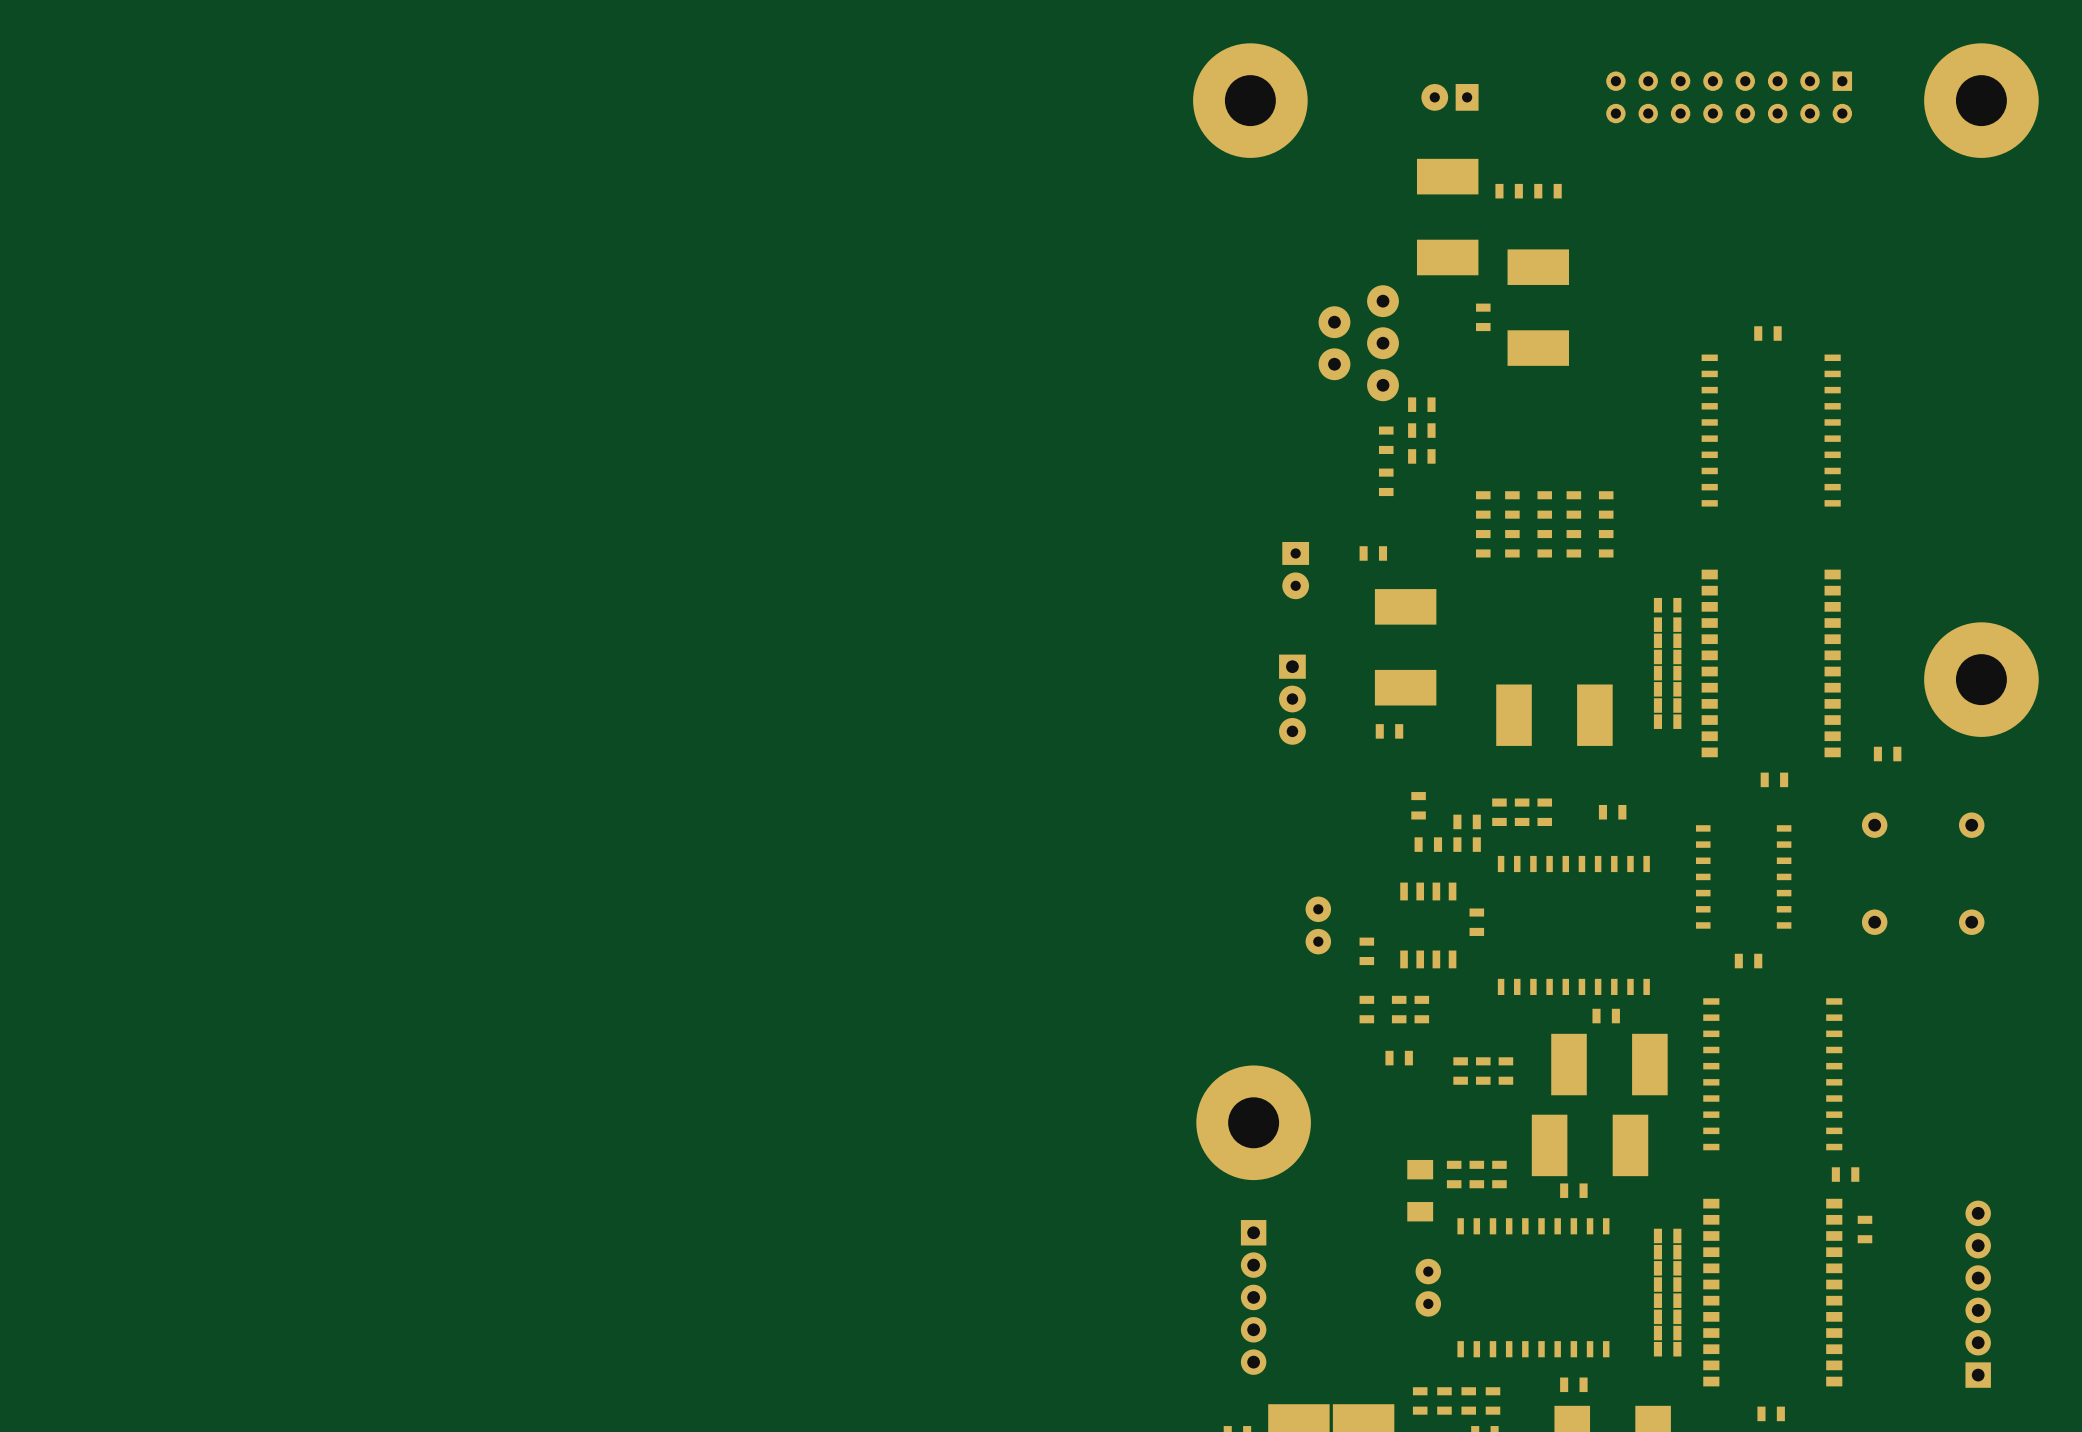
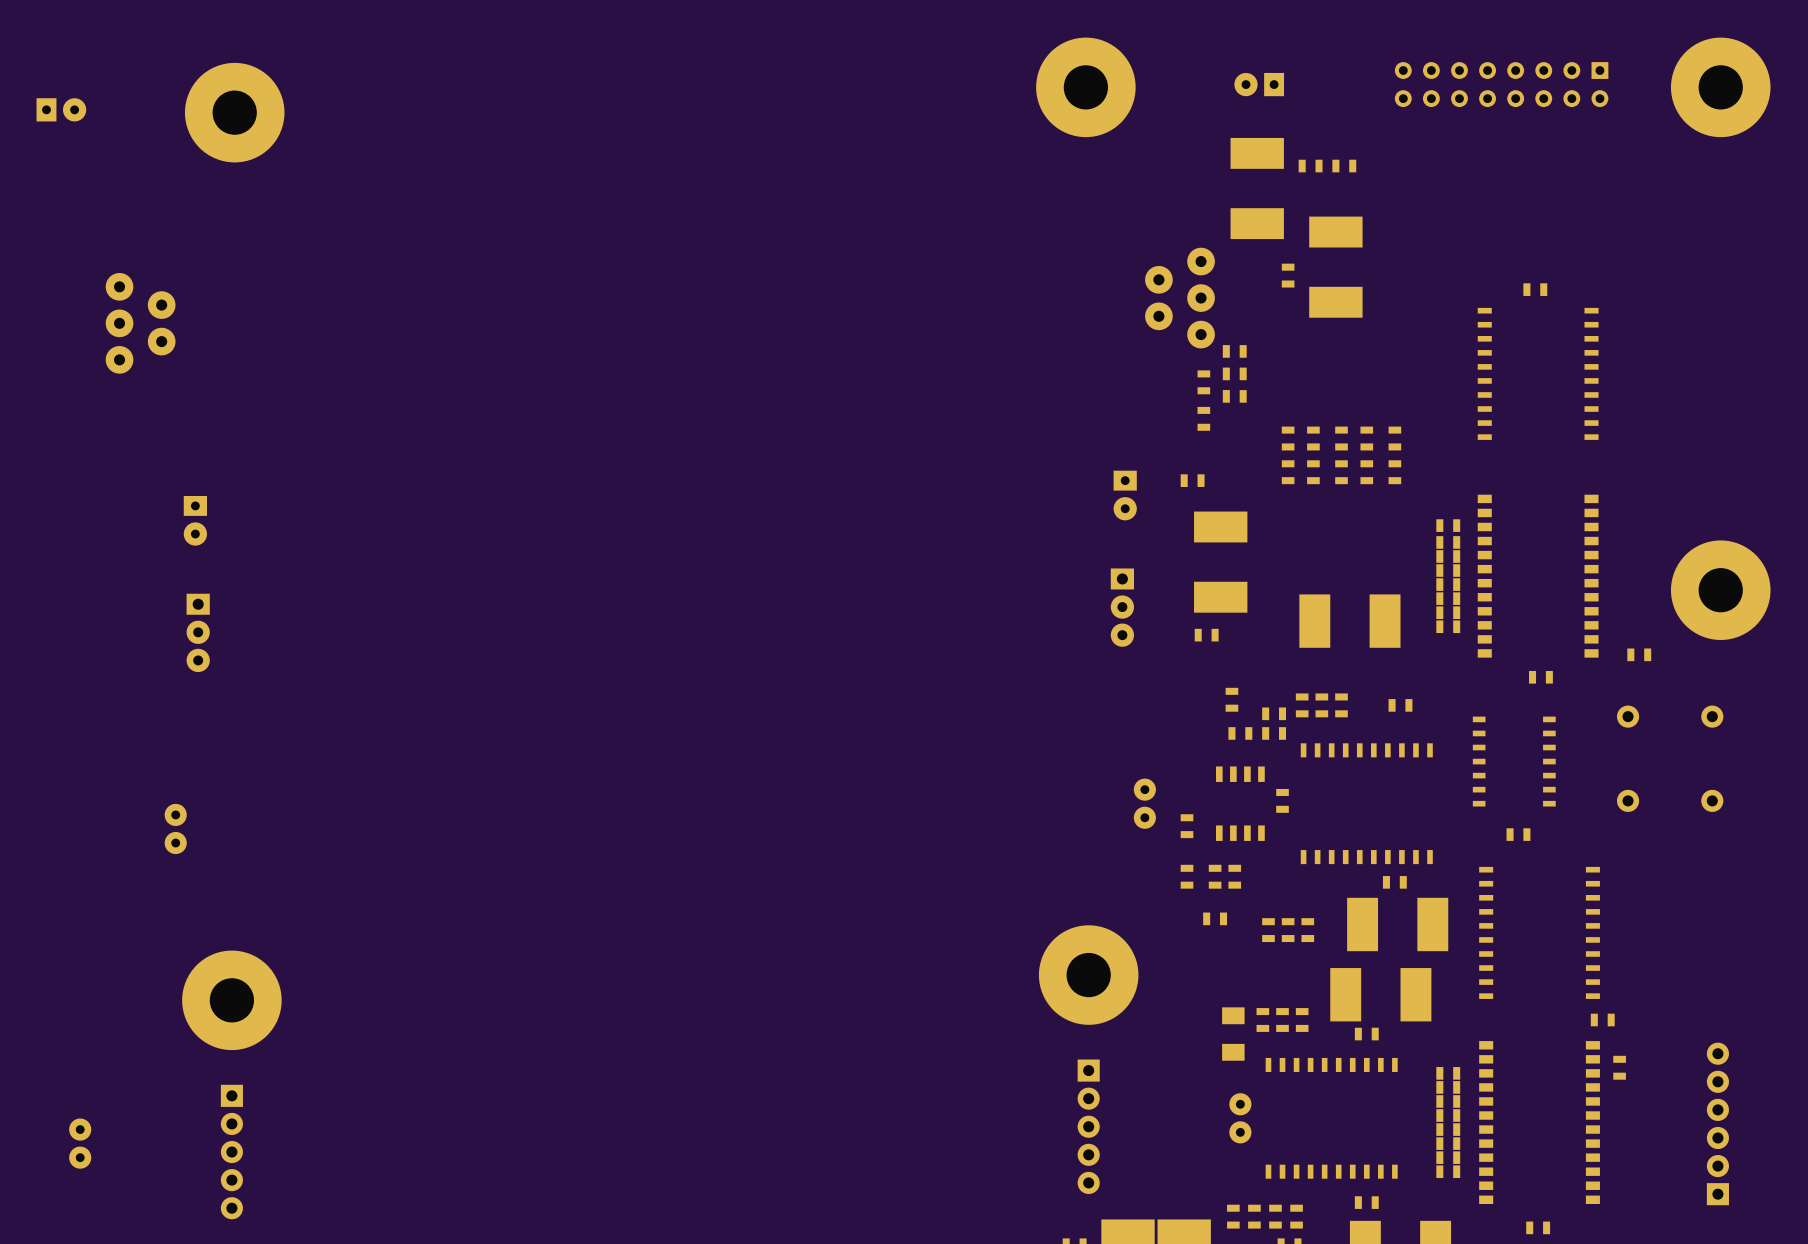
part: none -> (61, 109)
part: none -> (234, 112)
part: none -> (140, 323)
part: none -> (195, 520)
part: none -> (198, 632)
part: none -> (175, 828)
part: none -> (231, 1000)
part: none -> (80, 1143)
part: none -> (231, 1152)

